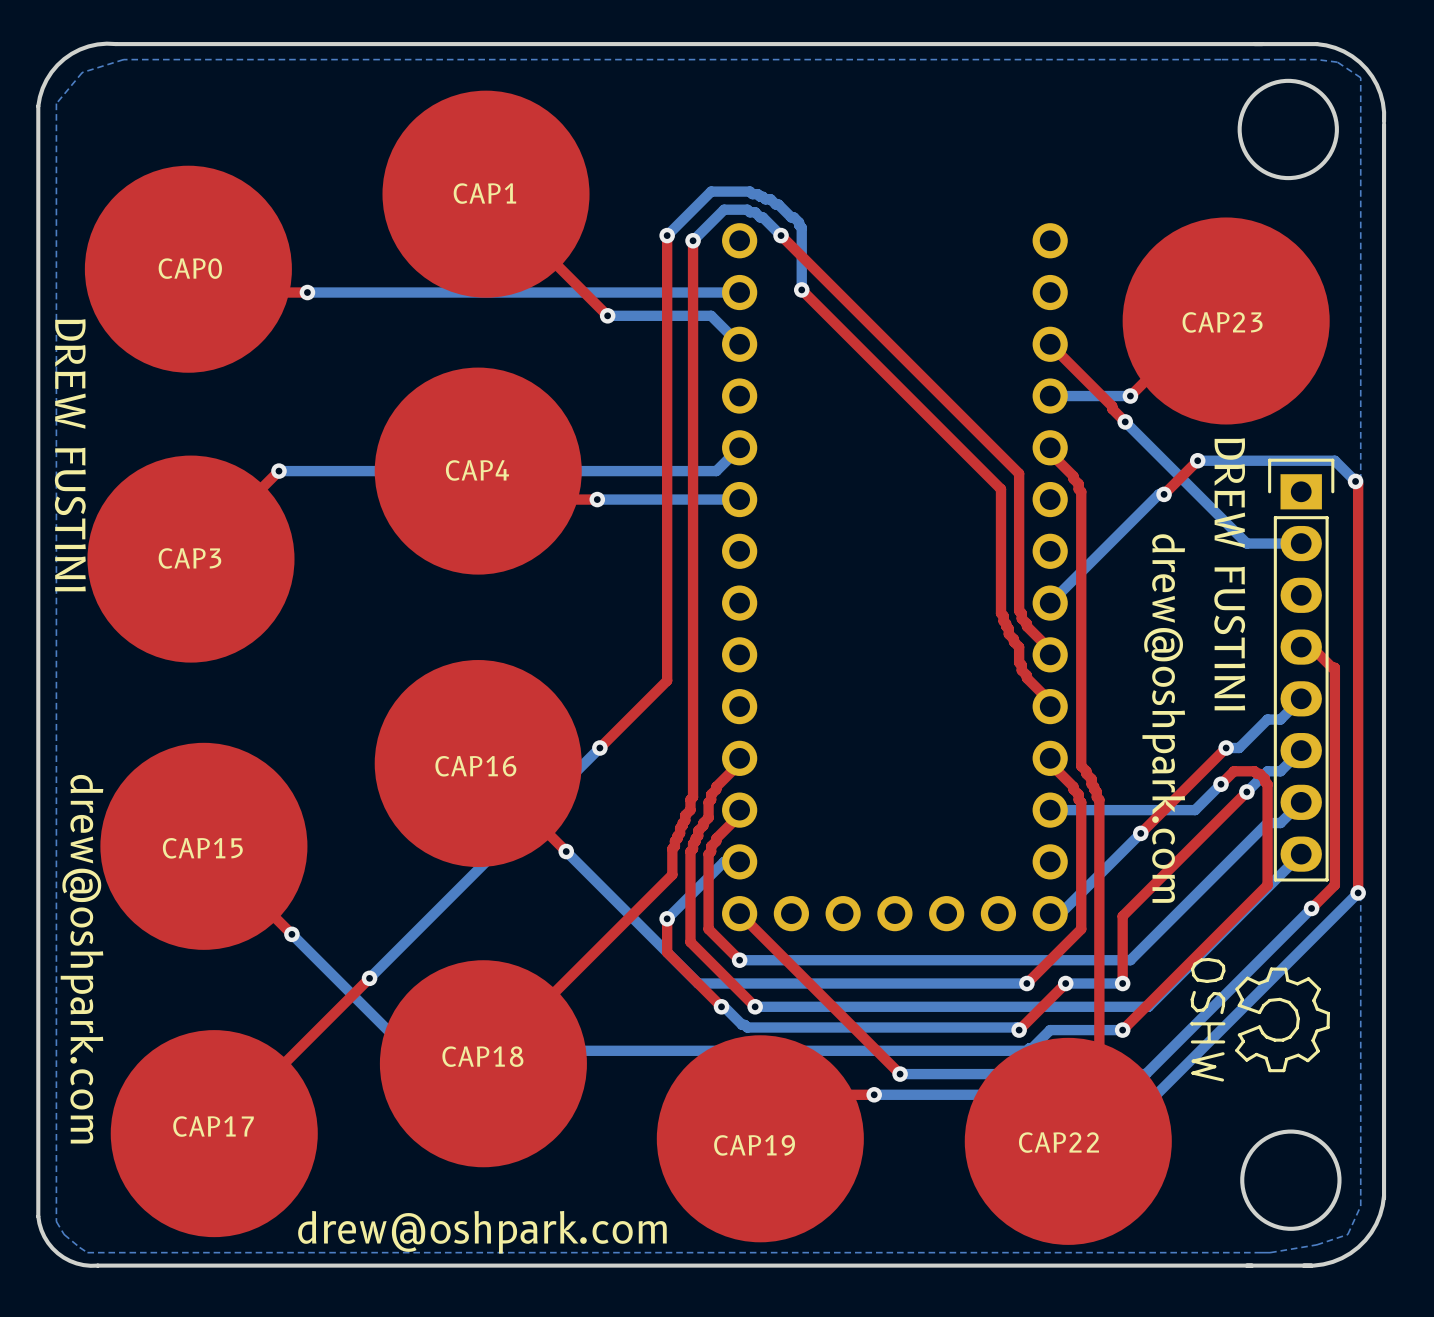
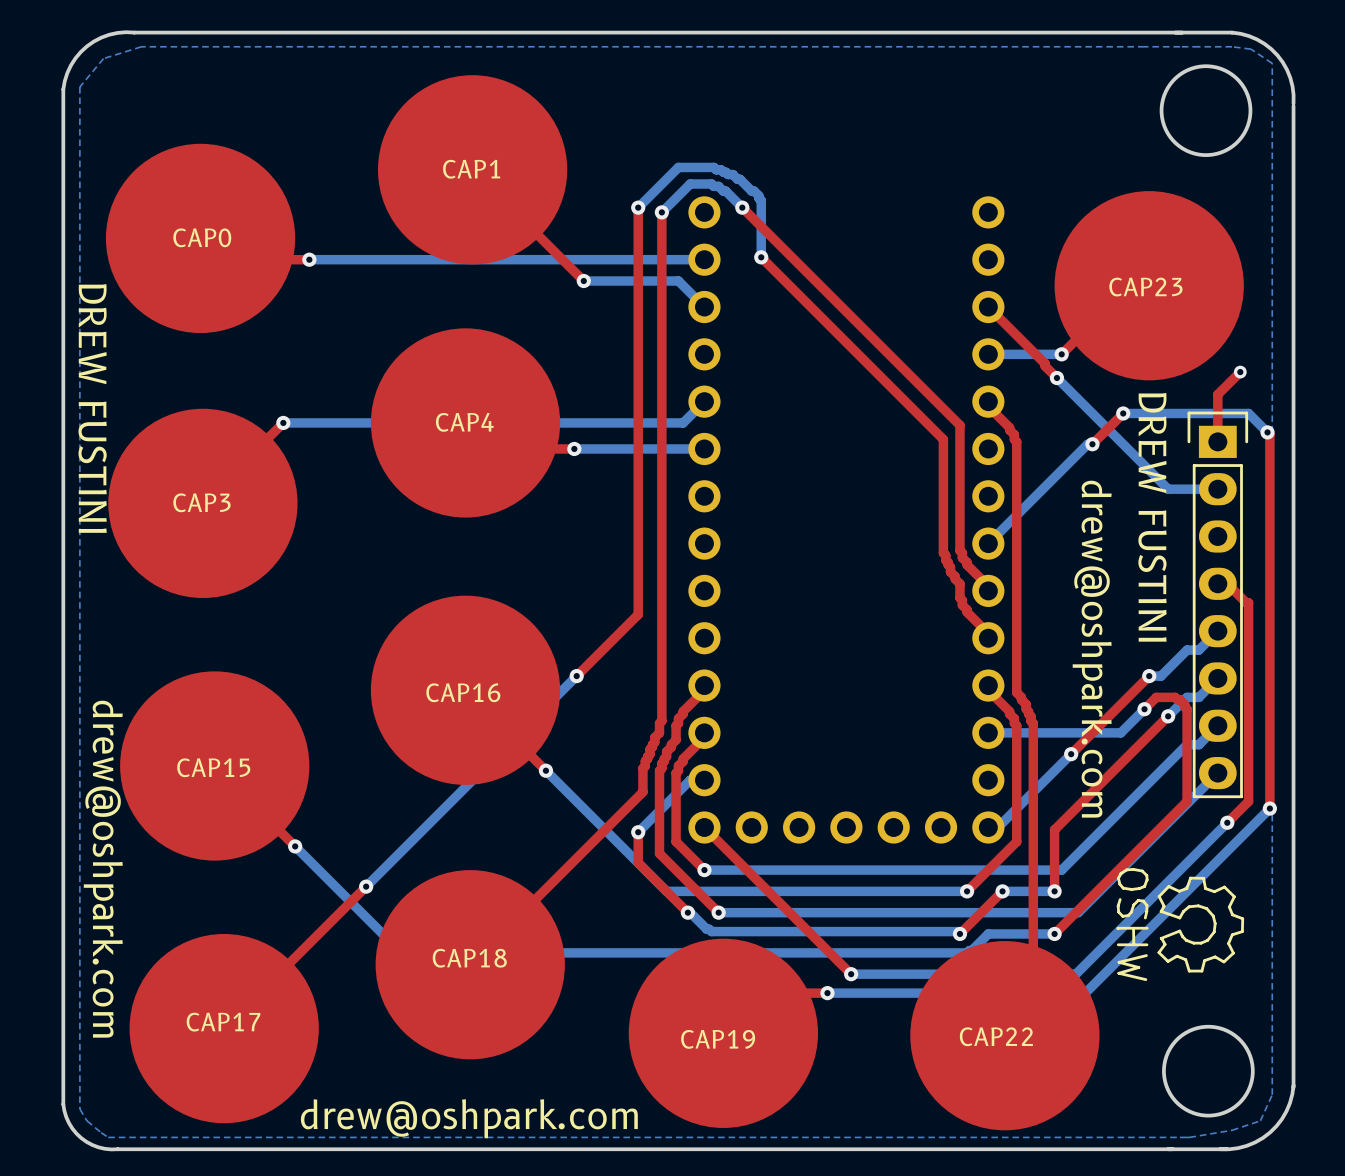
top track: none -> (1240, 372) (1217, 394) (1217, 441)
via: none -> (1240, 372)

